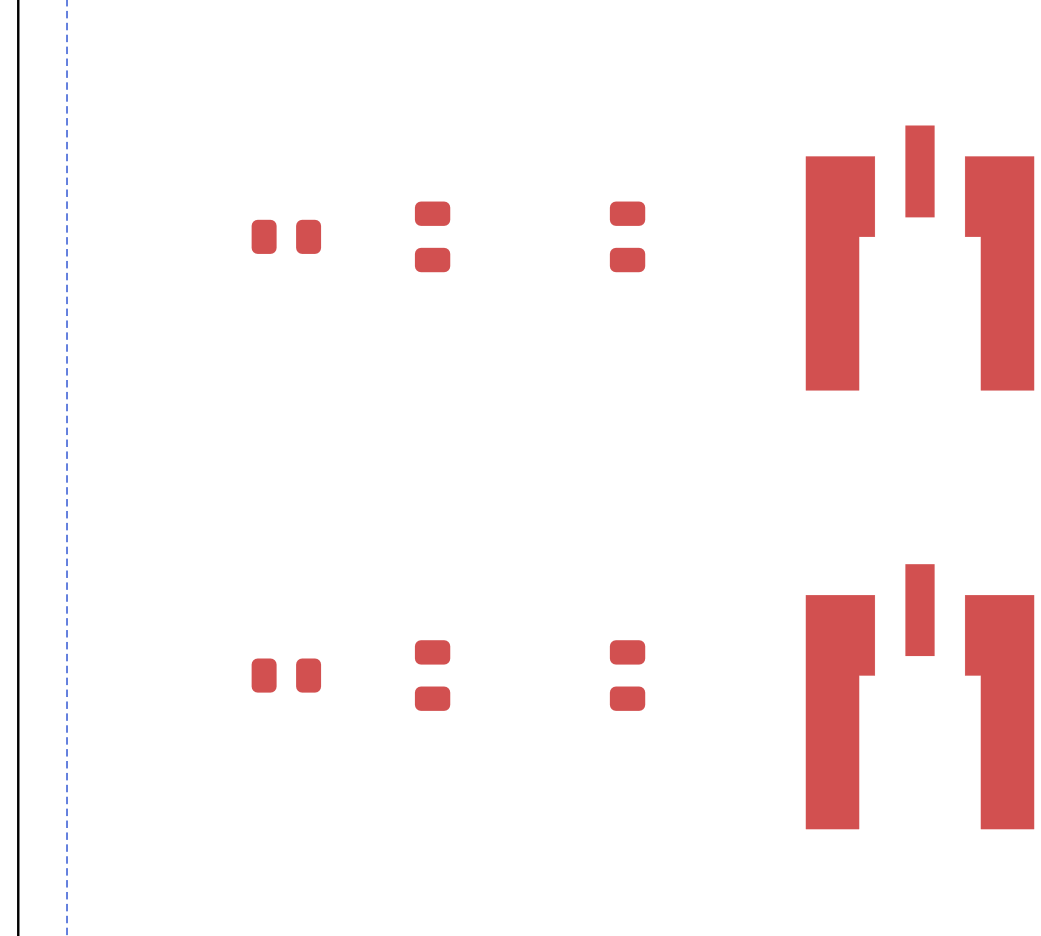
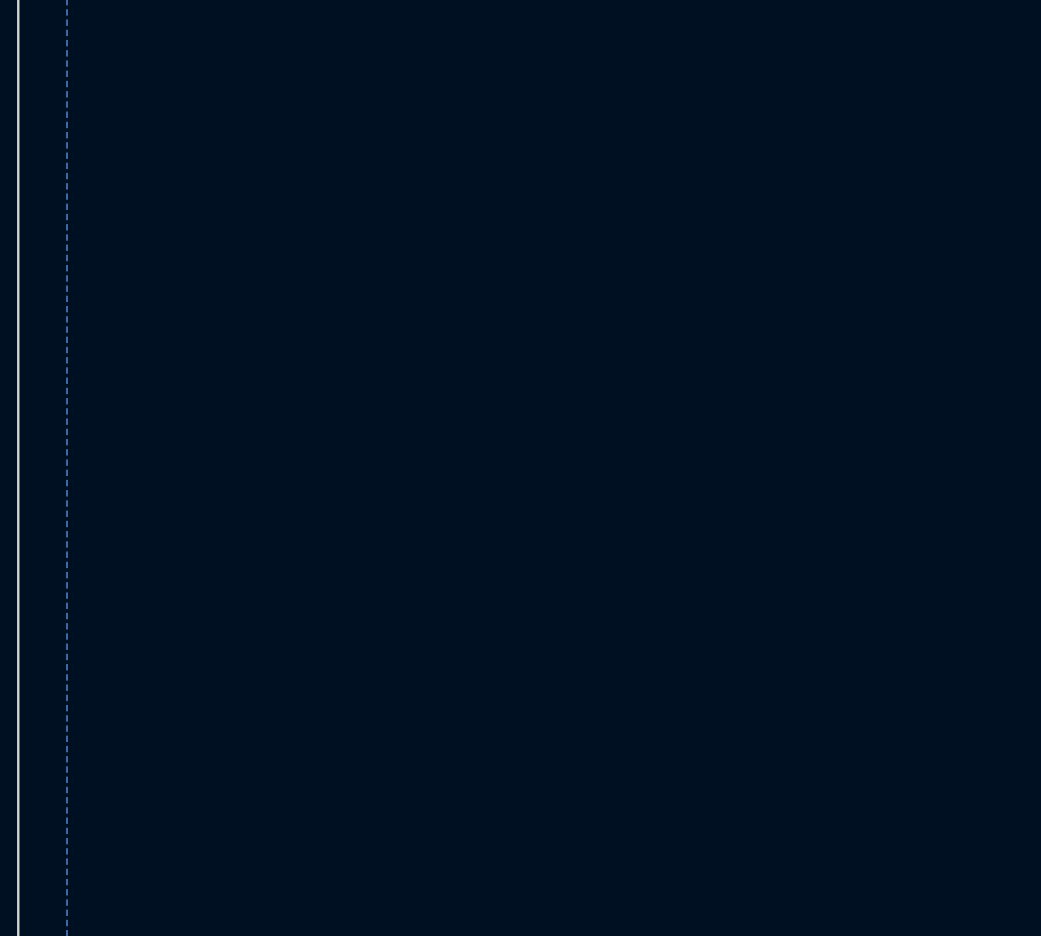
part: (286, 236) -> none
part: (432, 236) -> none
part: (627, 236) -> none
part: (920, 258) -> none
part: (286, 675) -> none
part: (432, 675) -> none
part: (627, 675) -> none
part: (920, 696) -> none

